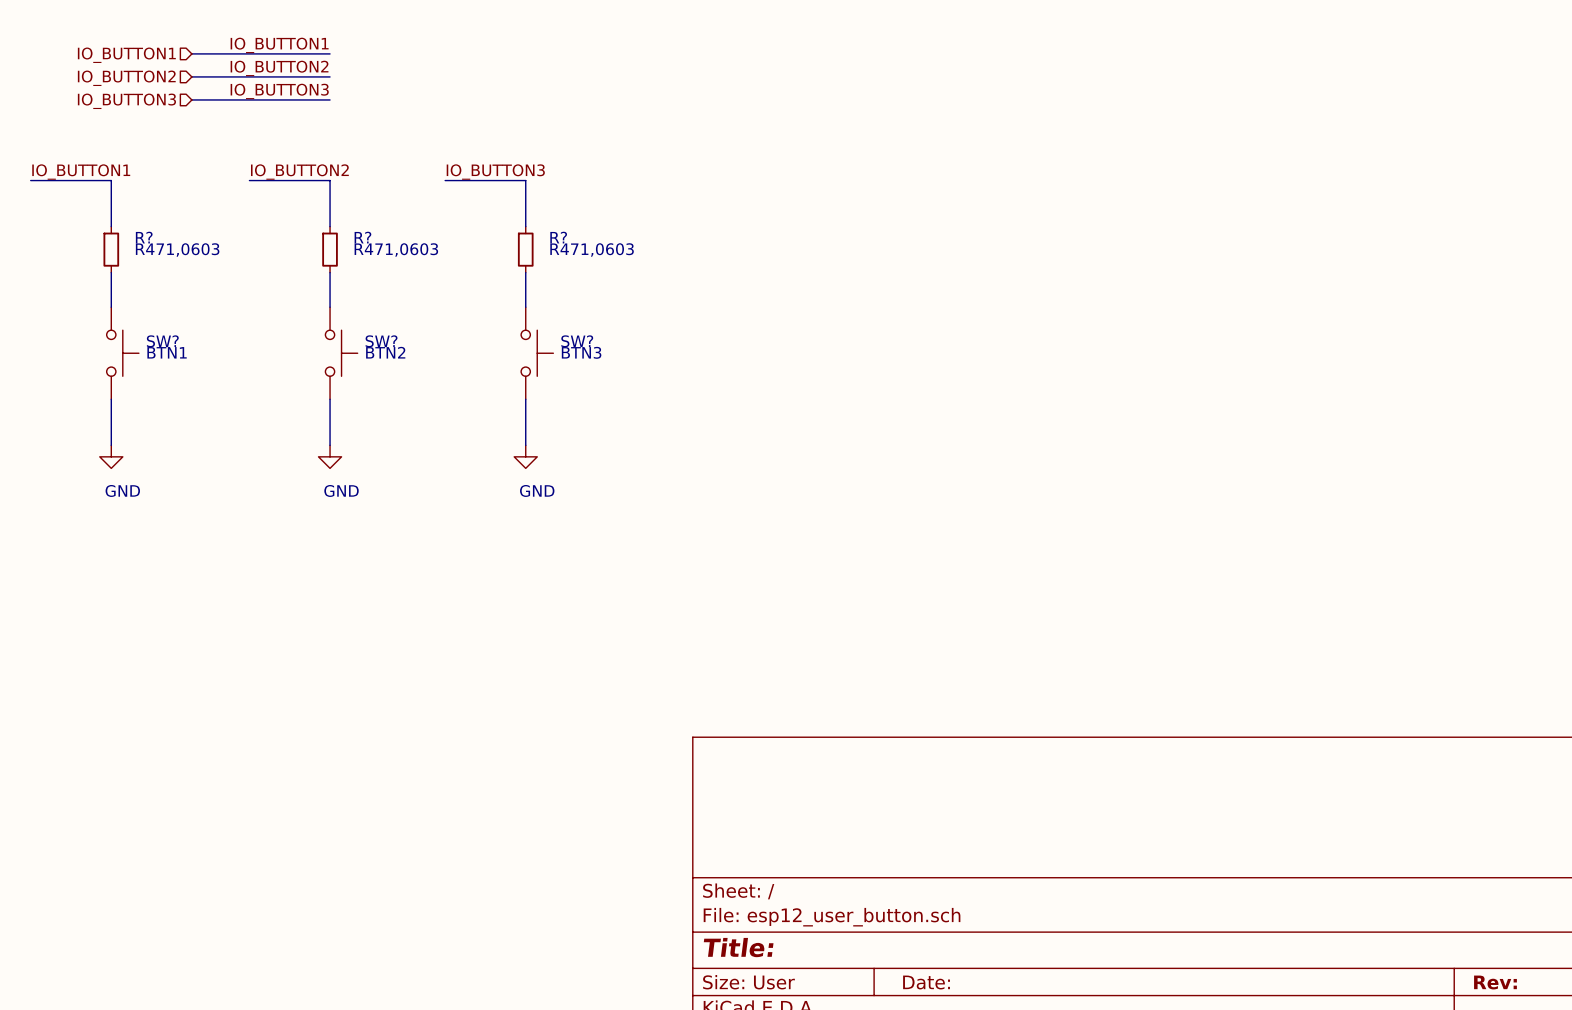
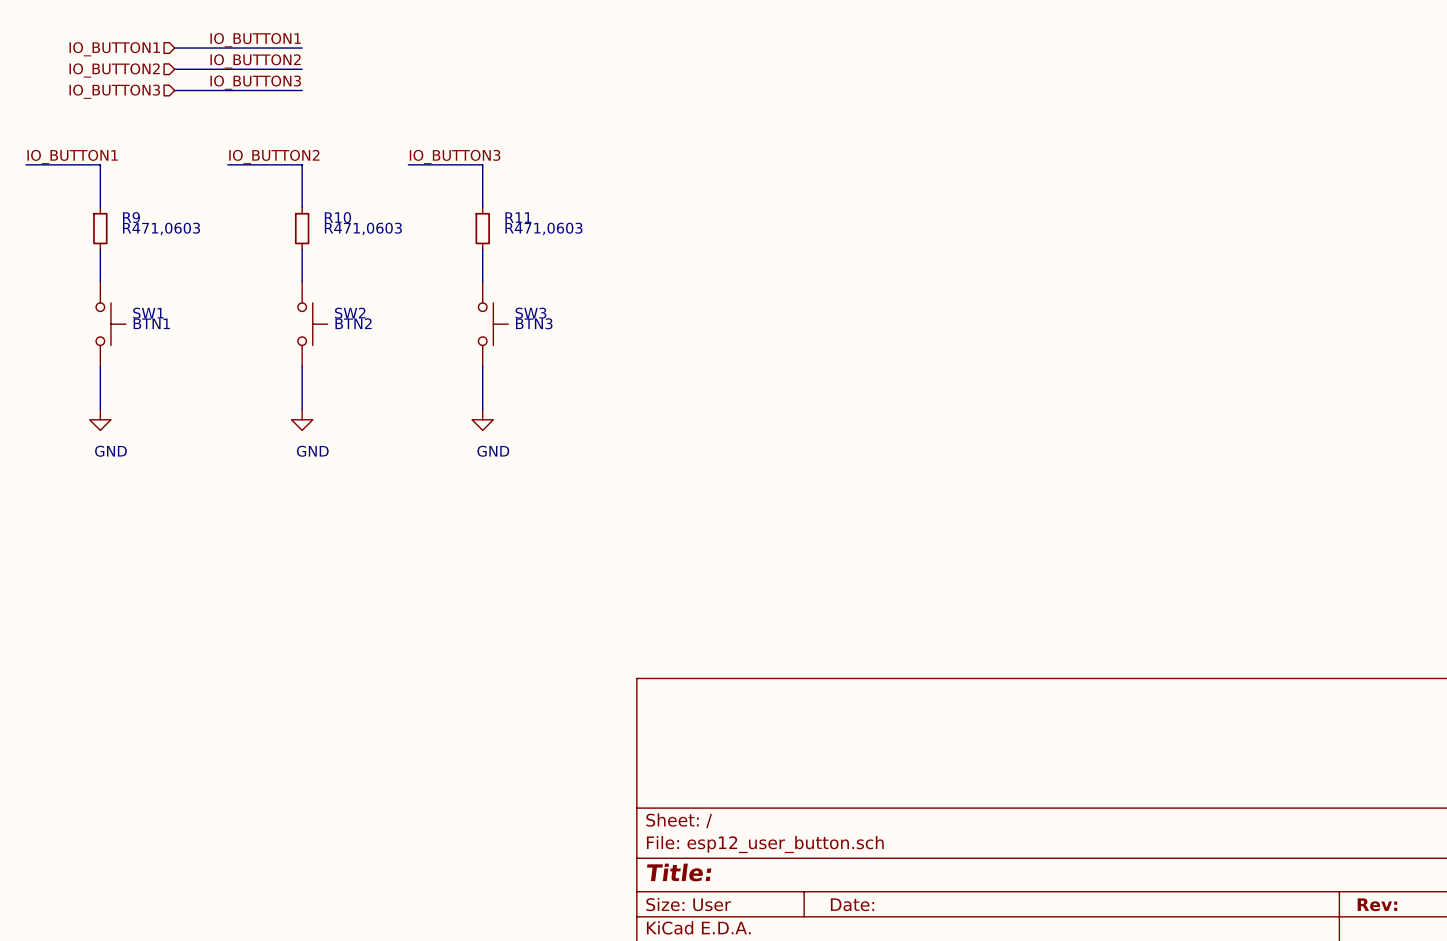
R? name: R? (144, 237) -> R9 (131, 217)
R? name: R? (362, 237) -> R10 (337, 217)
R? name: R? (558, 237) -> R11 (518, 217)
SW? name: SW? (162, 341) -> SW1 (148, 313)
SW? name: SW? (381, 341) -> SW2 (350, 313)
SW? name: SW? (577, 341) -> SW3 (530, 313)

